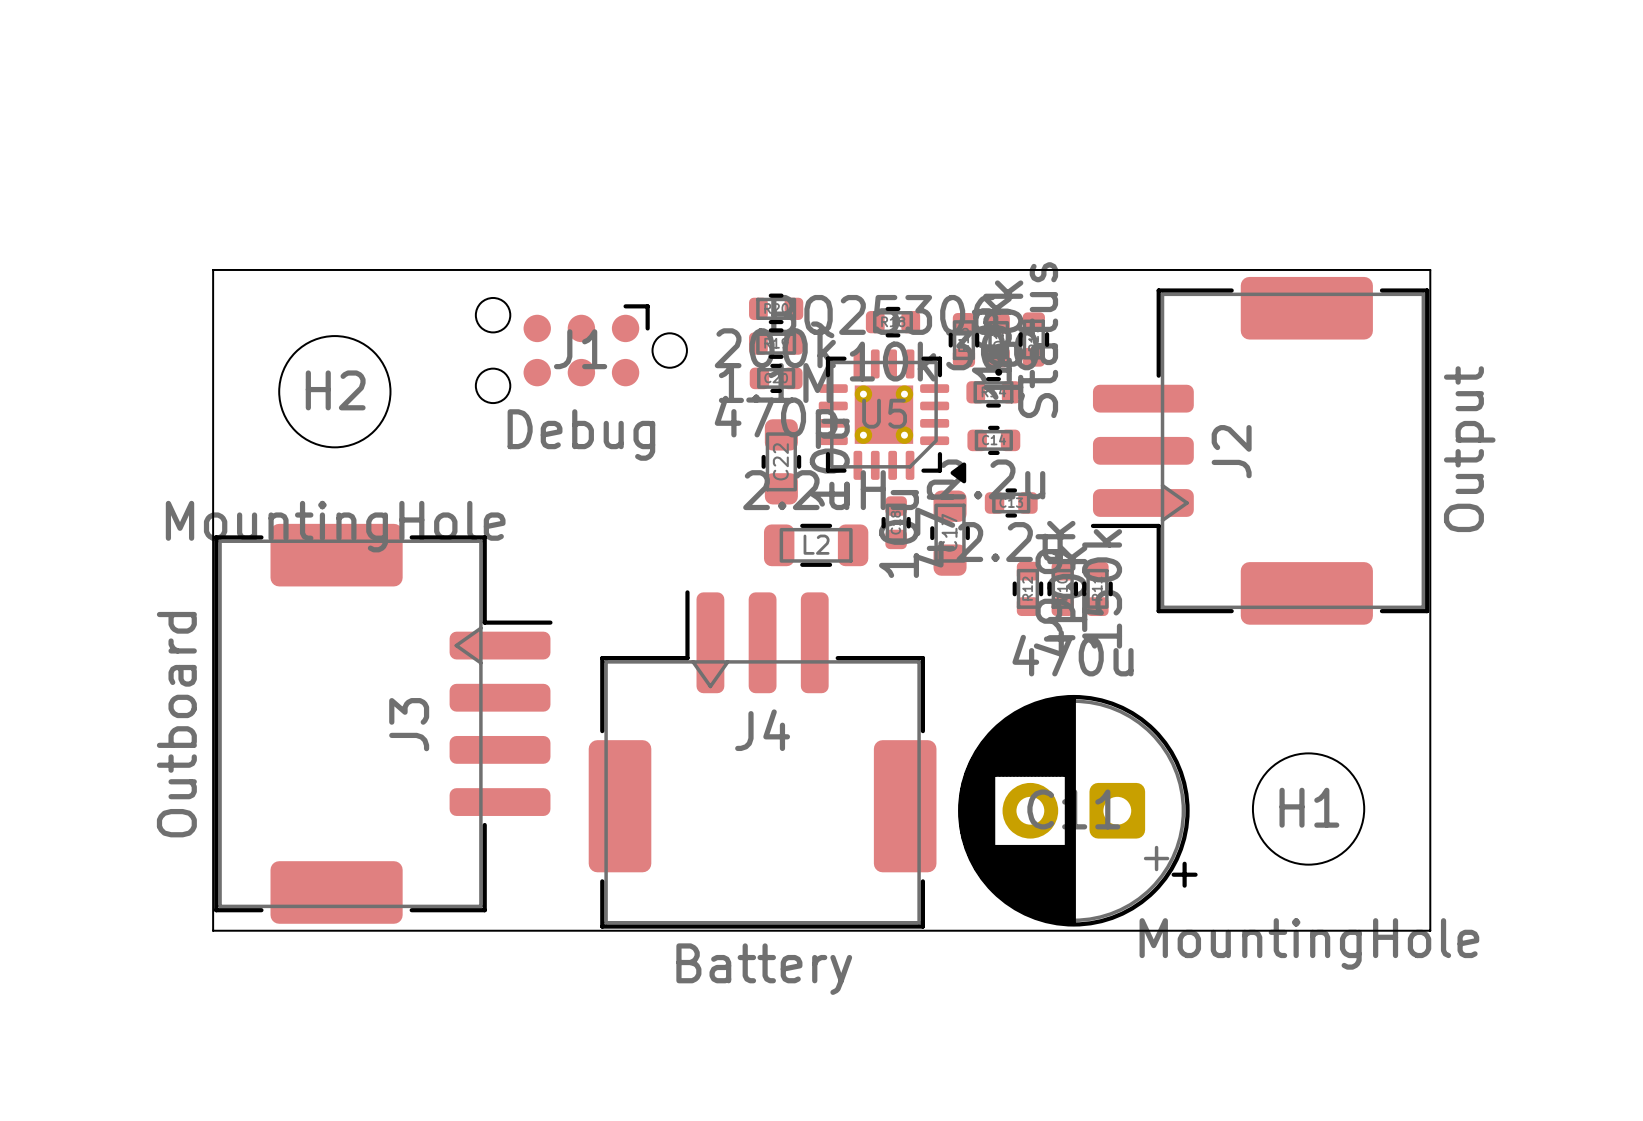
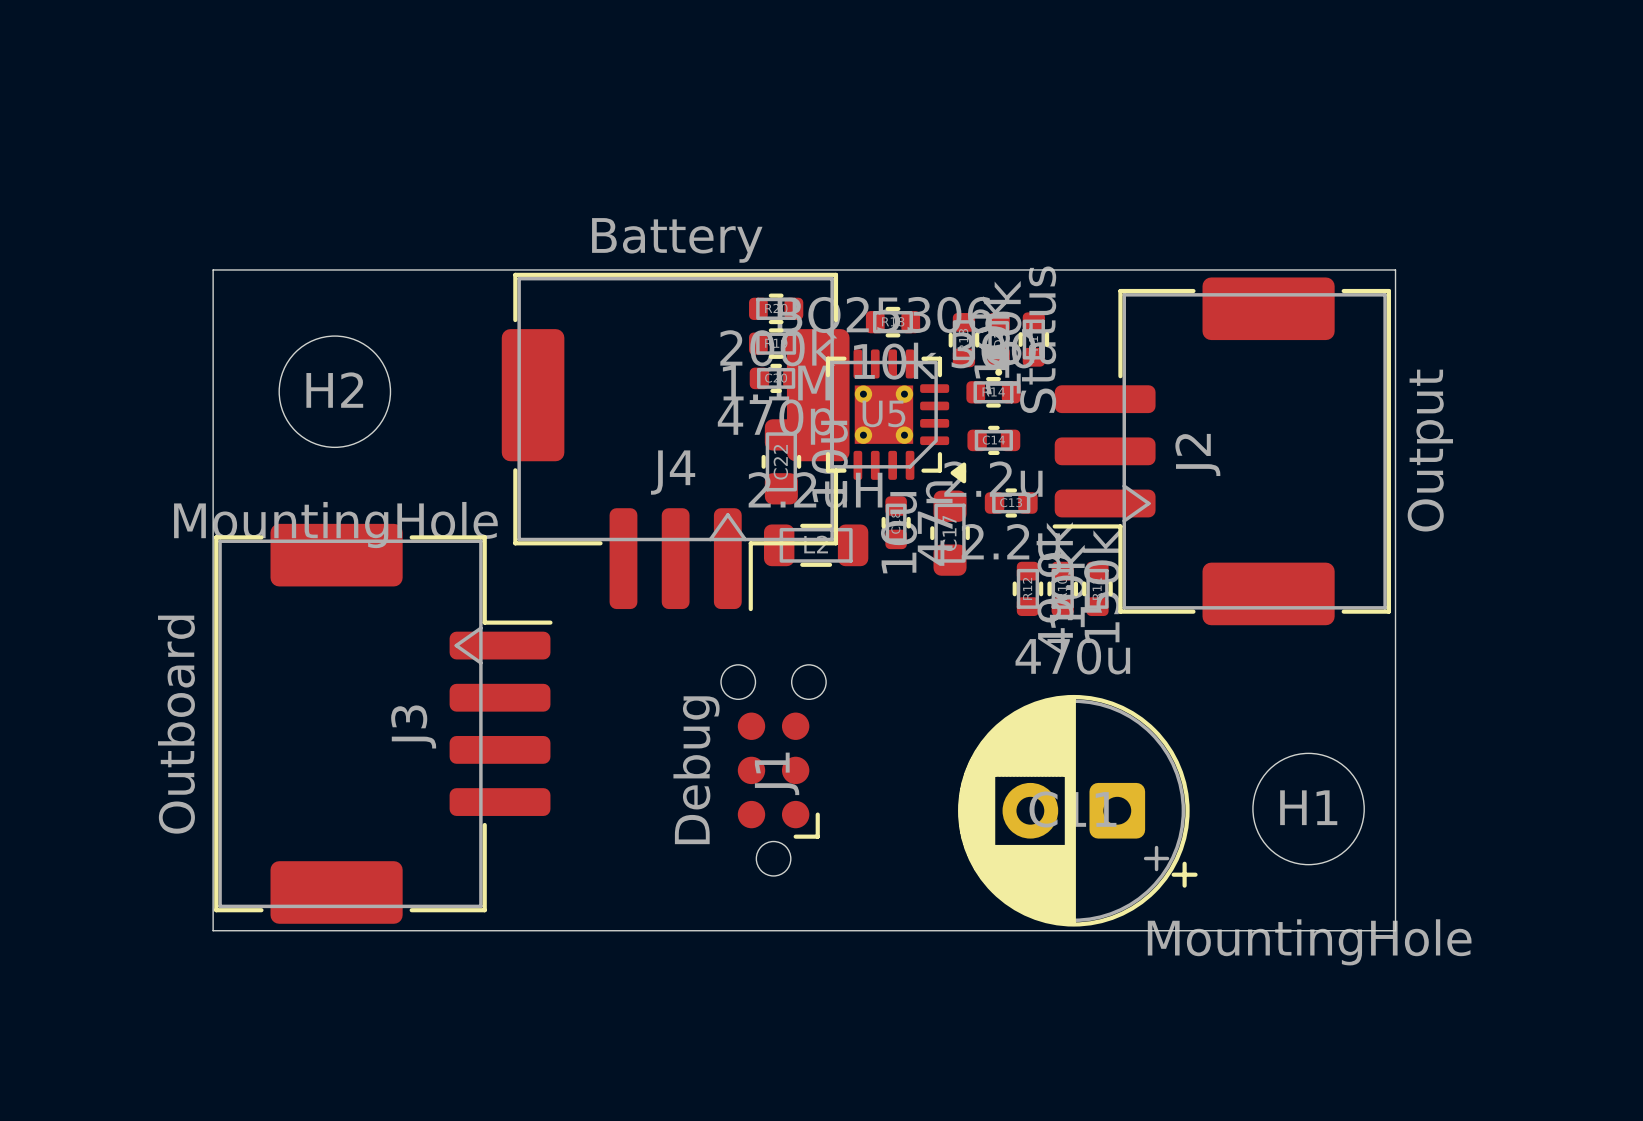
board edge: (1395, 269) (1430, 269) (1430, 930) (1395, 930) -> (1395, 269) (1395, 930)
J1 rotation: 0° (581, 350) -> 90° clockwise (773, 770)
J1 position: (581, 350) -> (773, 770)
J2 position: (1260, 450) -> (1221, 451)
J4 rotation: 0° (762, 759) -> 180° (675, 441)
J4 position: (762, 759) -> (675, 441)

